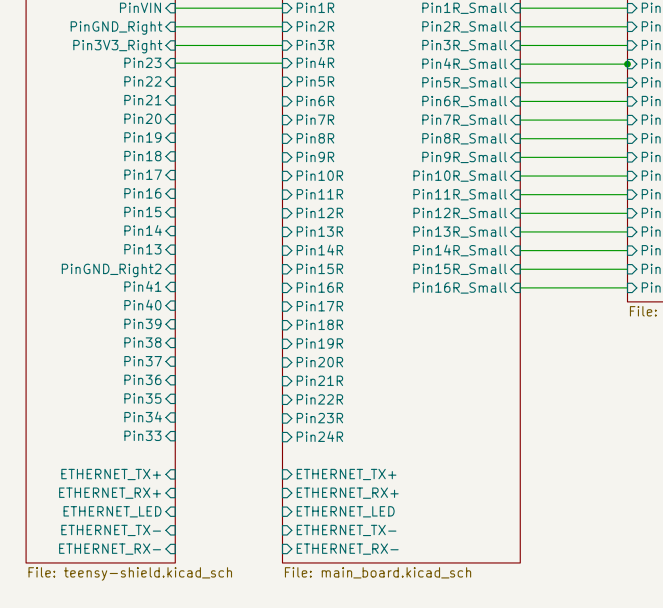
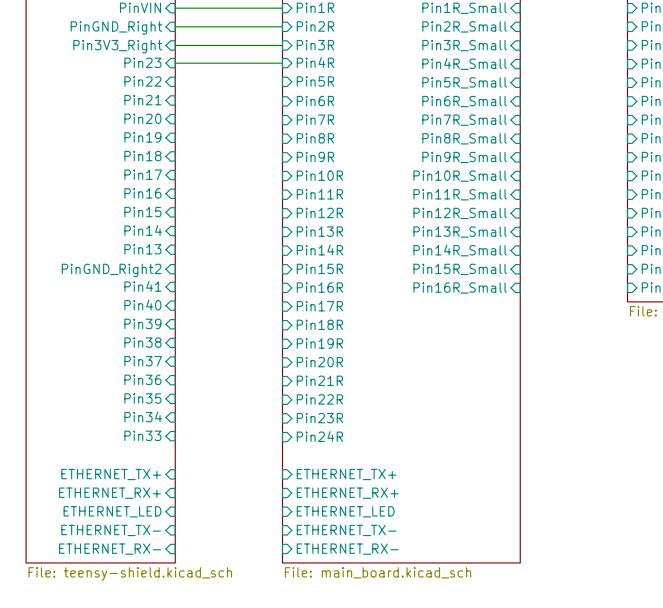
wire: (520, 8) (627, 8) -> none
wire: (520, 26) (627, 26) -> none
wire: (520, 45) (627, 45) -> none
wire: (520, 64) (627, 64) -> none
junction: (627, 64) -> none
wire: (520, 82) (627, 82) -> none
wire: (520, 101) (627, 101) -> none
wire: (520, 120) (627, 120) -> none
wire: (520, 138) (627, 138) -> none
wire: (520, 157) (627, 157) -> none
wire: (520, 176) (627, 176) -> none
wire: (520, 194) (627, 194) -> none
wire: (520, 213) (627, 213) -> none
wire: (520, 231) (627, 231) -> none
wire: (520, 250) (627, 250) -> none
wire: (520, 269) (627, 269) -> none
wire: (520, 287) (627, 287) -> none

